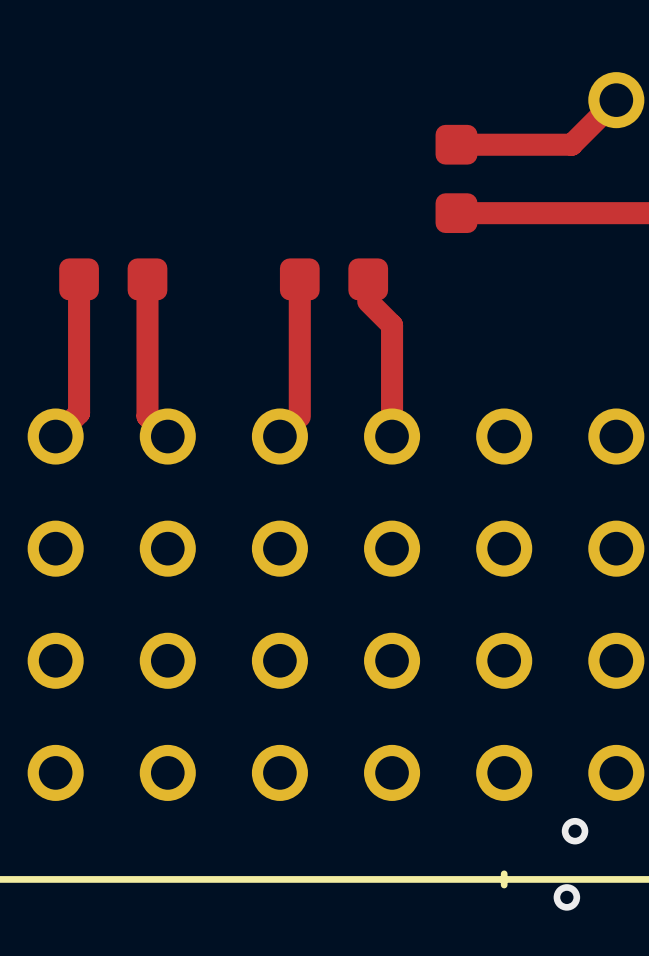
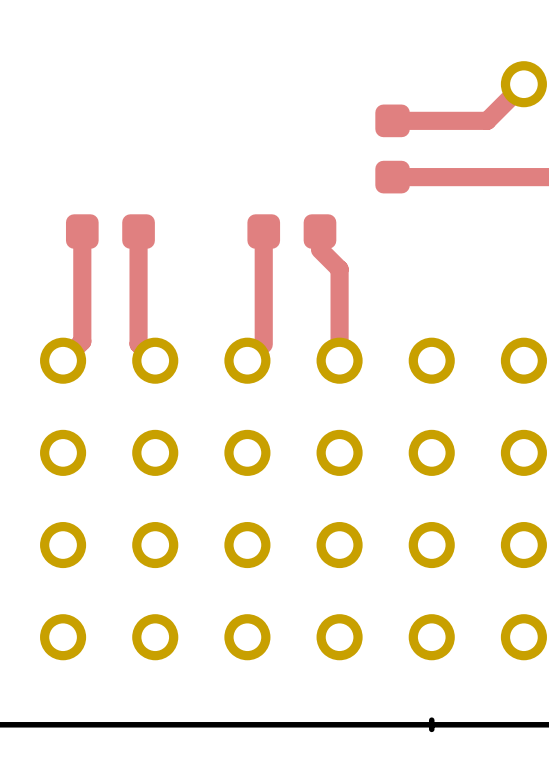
via: (575, 831) -> none
via: (566, 897) -> none

